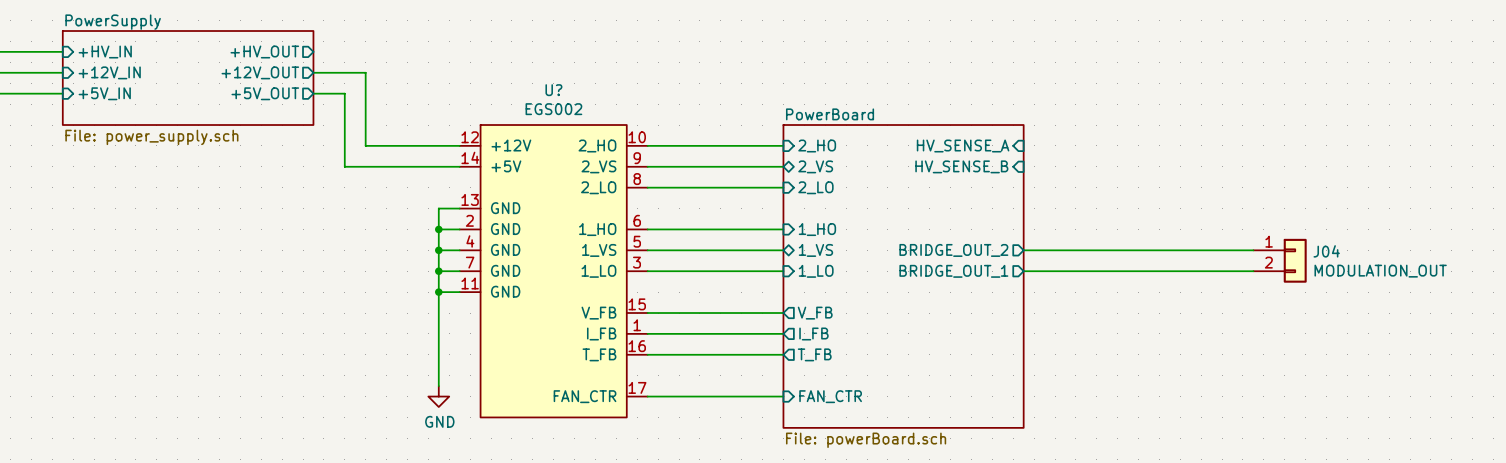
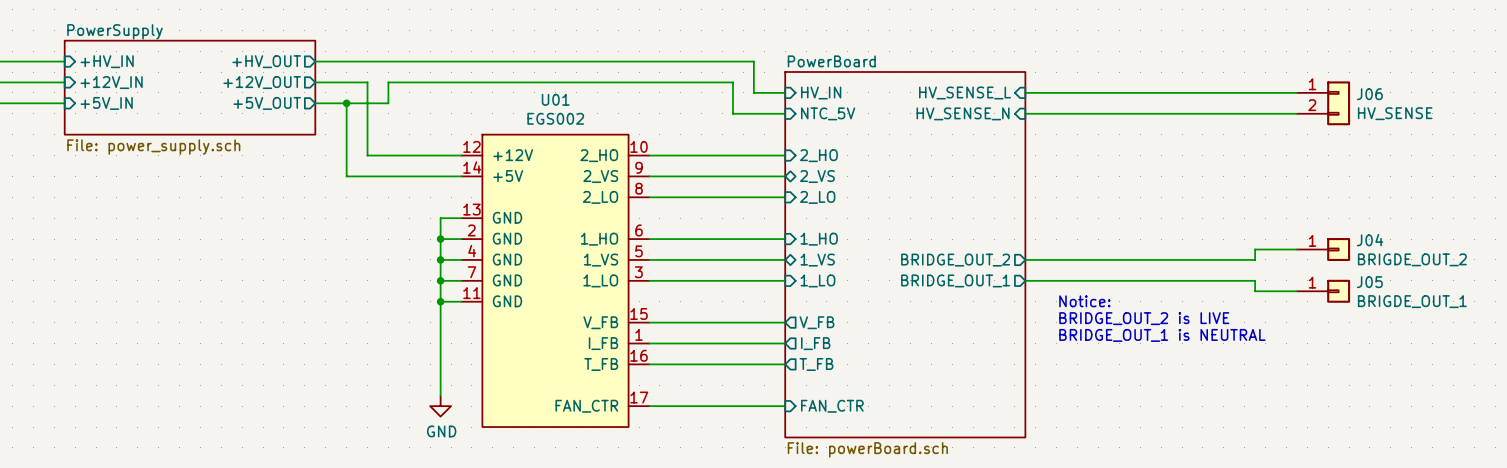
wire: none -> (315, 61) (753, 61) (753, 92) (785, 92)
sheet pin: none -> HV_IN (821, 92)
sheet pin: none -> HV_SENSE_L (965, 92)
wire: none -> (1025, 92) (1296, 92)
U? name: U? (553, 90) -> U01 (555, 99)
wire: none -> (346, 103) (388, 103) (388, 82) (732, 82) (732, 113) (785, 113)
junction: none -> (346, 103)
J06: none -> HV_SENSE (1323, 103)
sheet pin: none -> NTC_5V (828, 113)
sheet pin: none -> HV_SENSE_N (963, 113)
wire: none -> (1025, 113) (1296, 113)
sheet pin: HV_SENSE_A (963, 146) -> none
sheet pin: HV_SENSE_B (961, 166) -> none
J04 symbol: [1253, 238, 1307, 283] -> [1296, 238, 1351, 262]
wire: none -> (1296, 249) (1255, 249) (1255, 259)
sheet PowerBoard: none -> File: powerBoard.sch (905, 254)
wire: none -> (1255, 280) (1255, 291) (1296, 291)
J04 value: MODULATION_OUT (1380, 271) -> BRIGDE_OUT_2 (1412, 259)
sheet PowerBoard: File: powerBoard.sch (903, 276) -> none
J05: none -> BRIGDE_OUT_1 (1323, 291)
text: none -> Notice: (1084, 301)
text: none -> BRIDGE_OUT_2 is LIVE (1144, 318)
text: none -> BRIDGE_OUT_1 is NEUTRAL (1162, 335)

